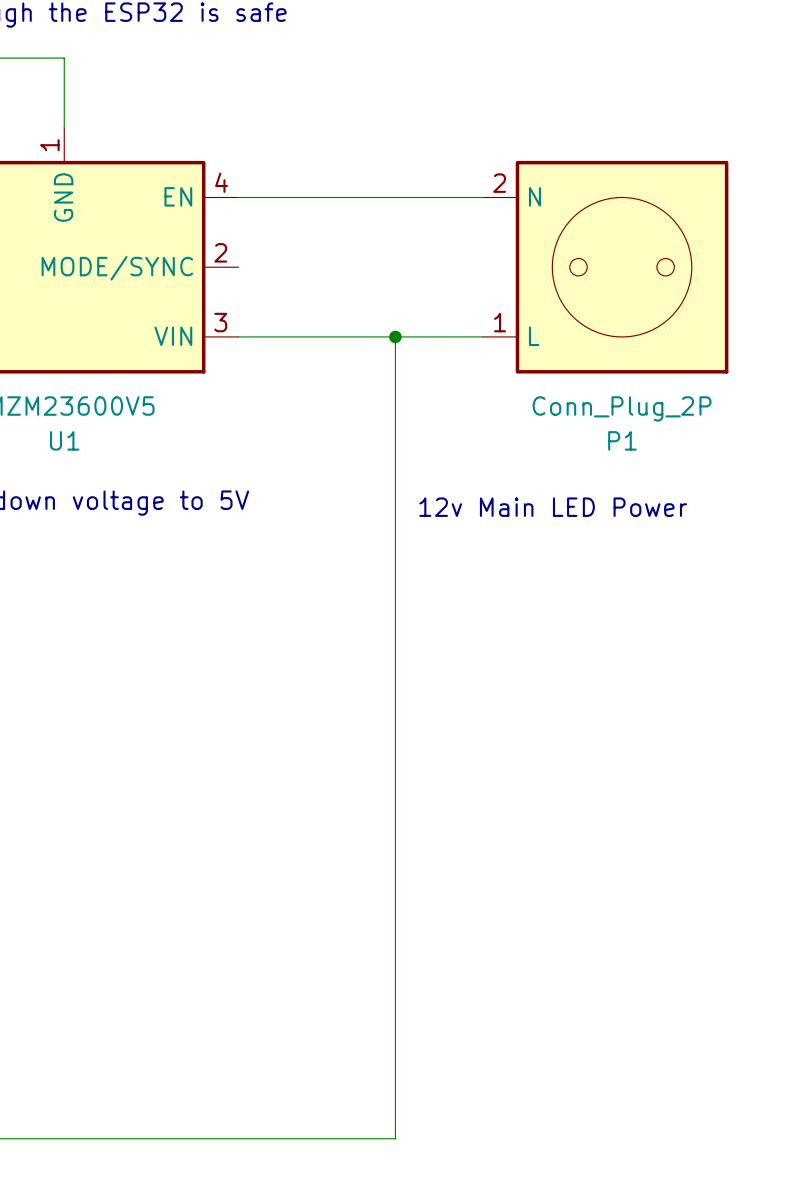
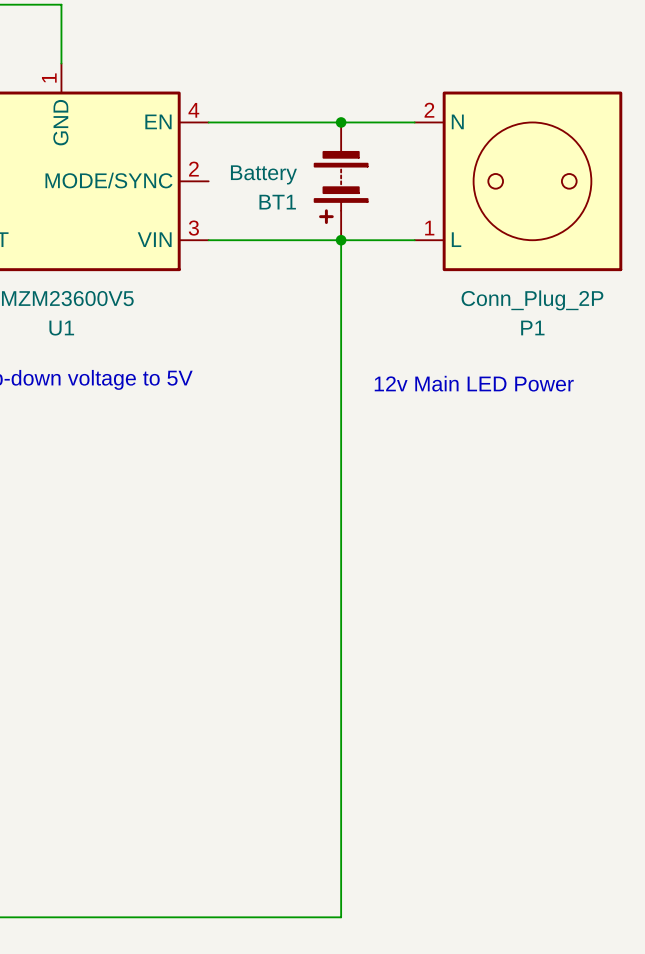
junction: none -> (341, 122)
BT1: none -> Battery (341, 181)

